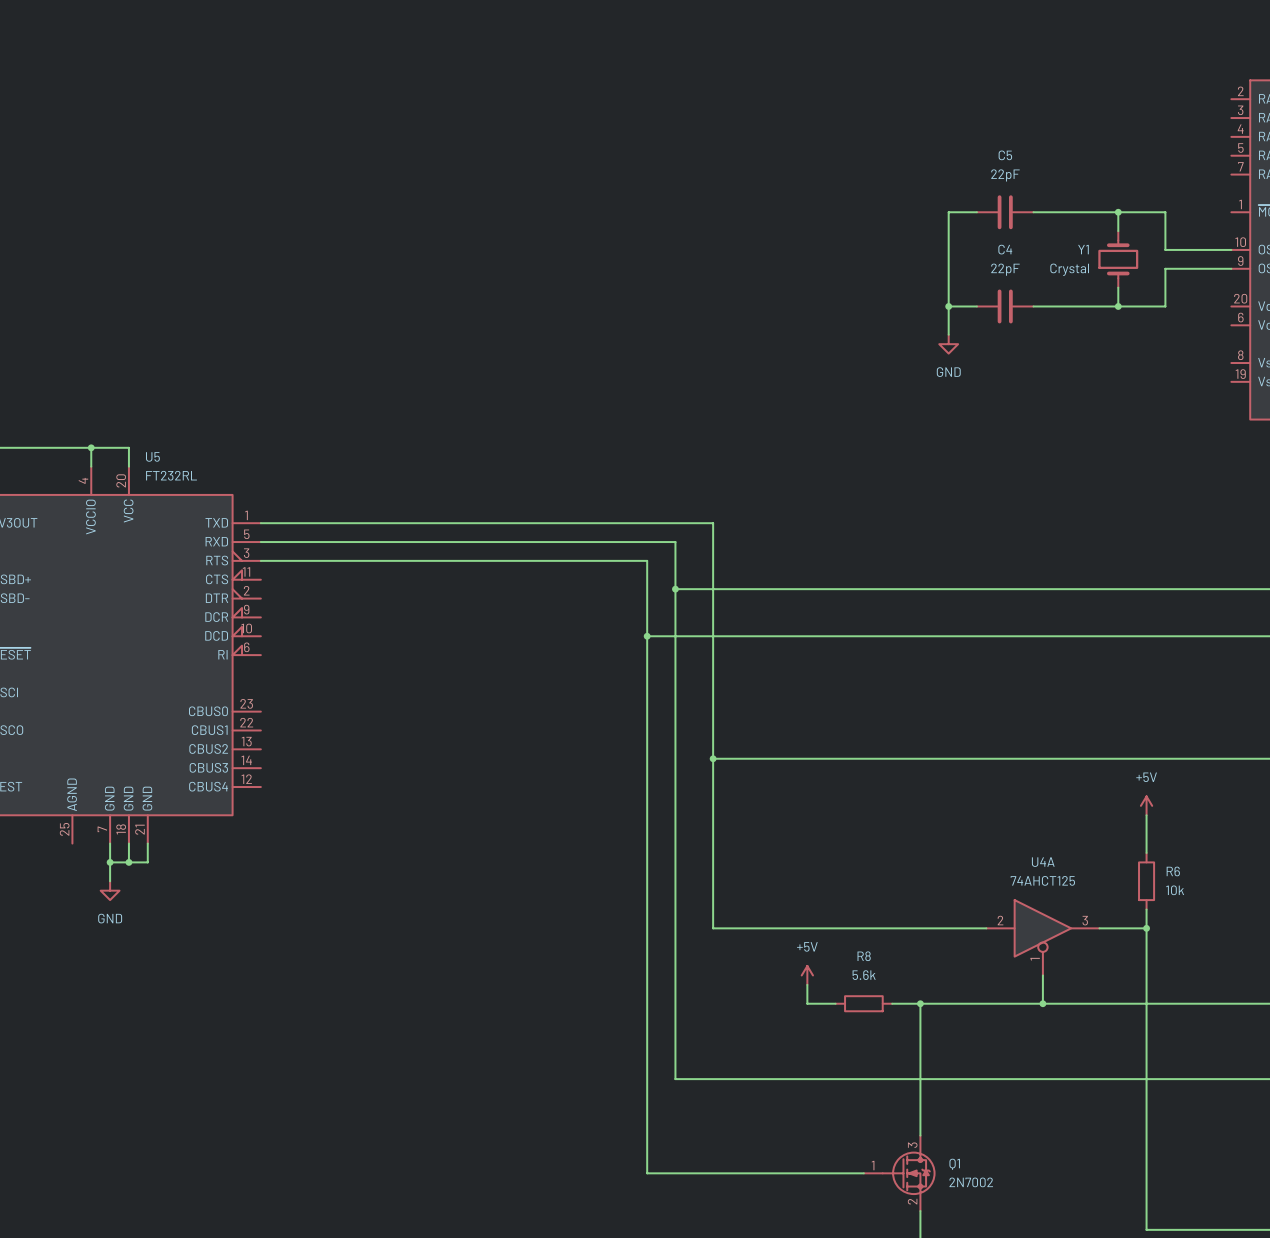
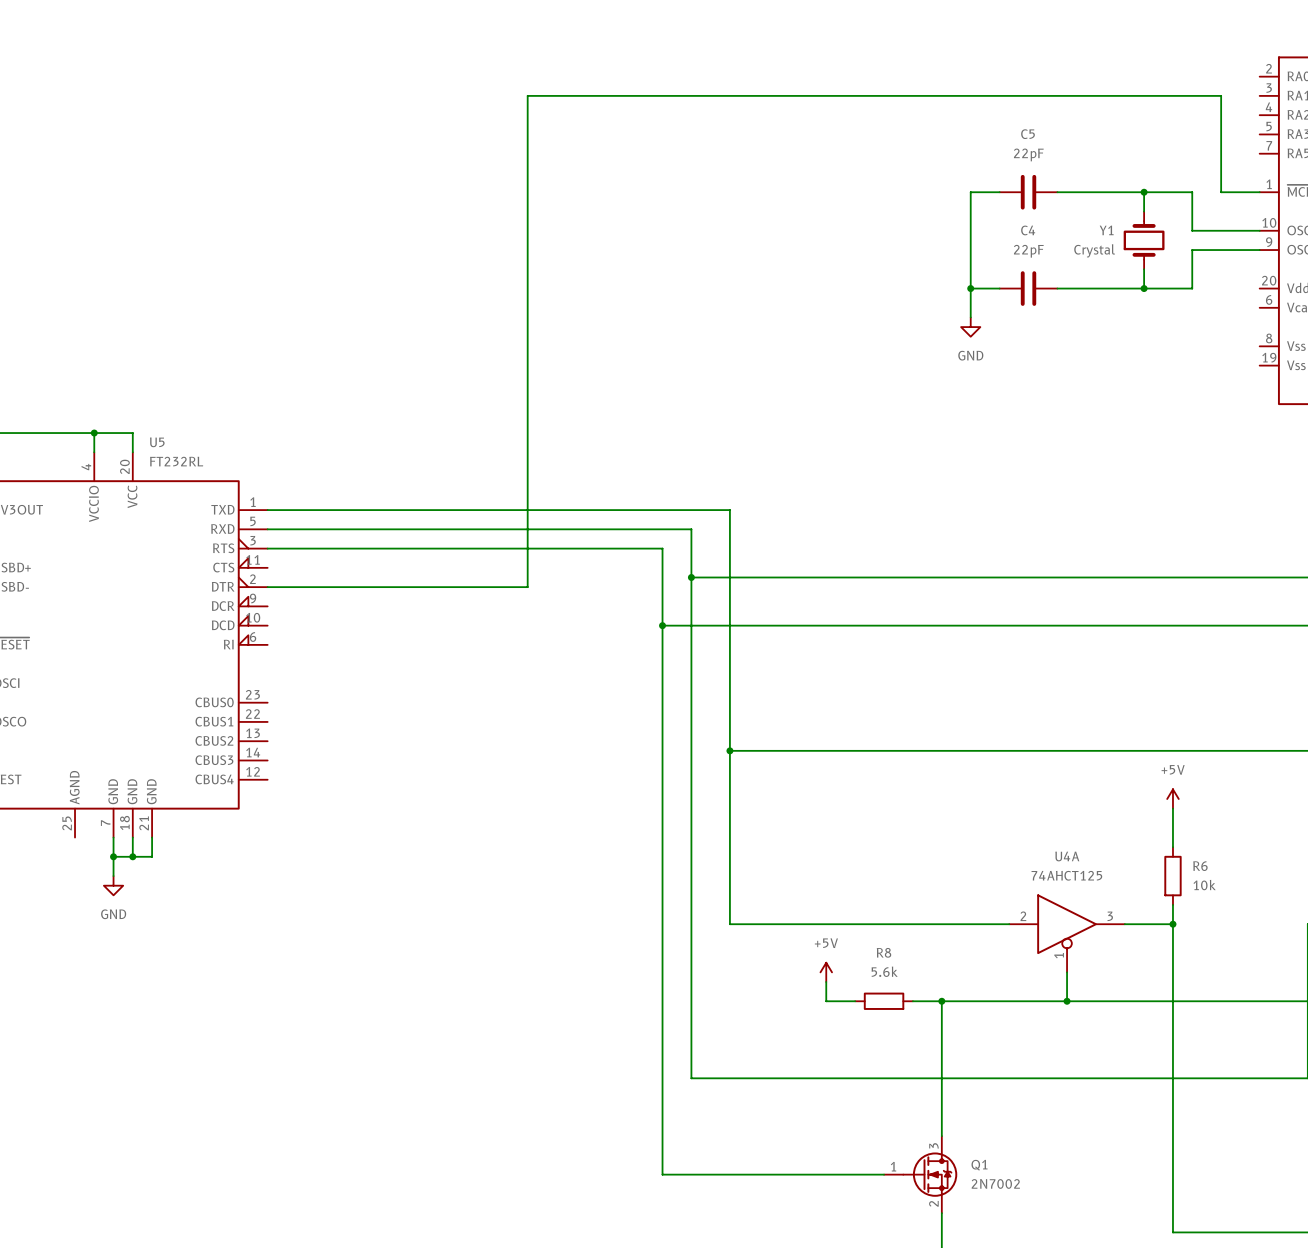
wire: none -> (1259, 192) (1221, 192) (1221, 95) (527, 95) (527, 587) (267, 587)

